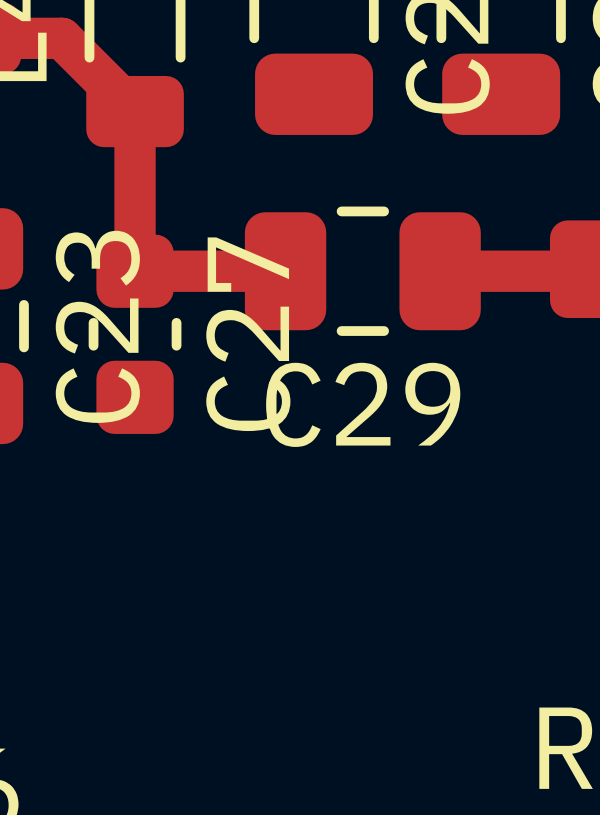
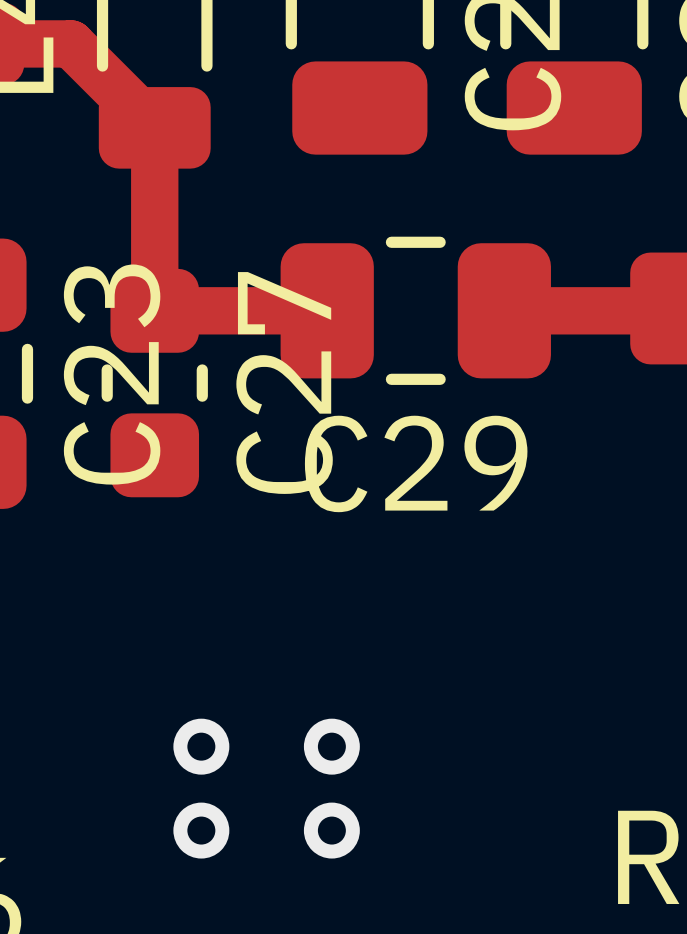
via: none -> (201, 746)
via: none -> (331, 746)
via: none -> (201, 830)
via: none -> (331, 830)

